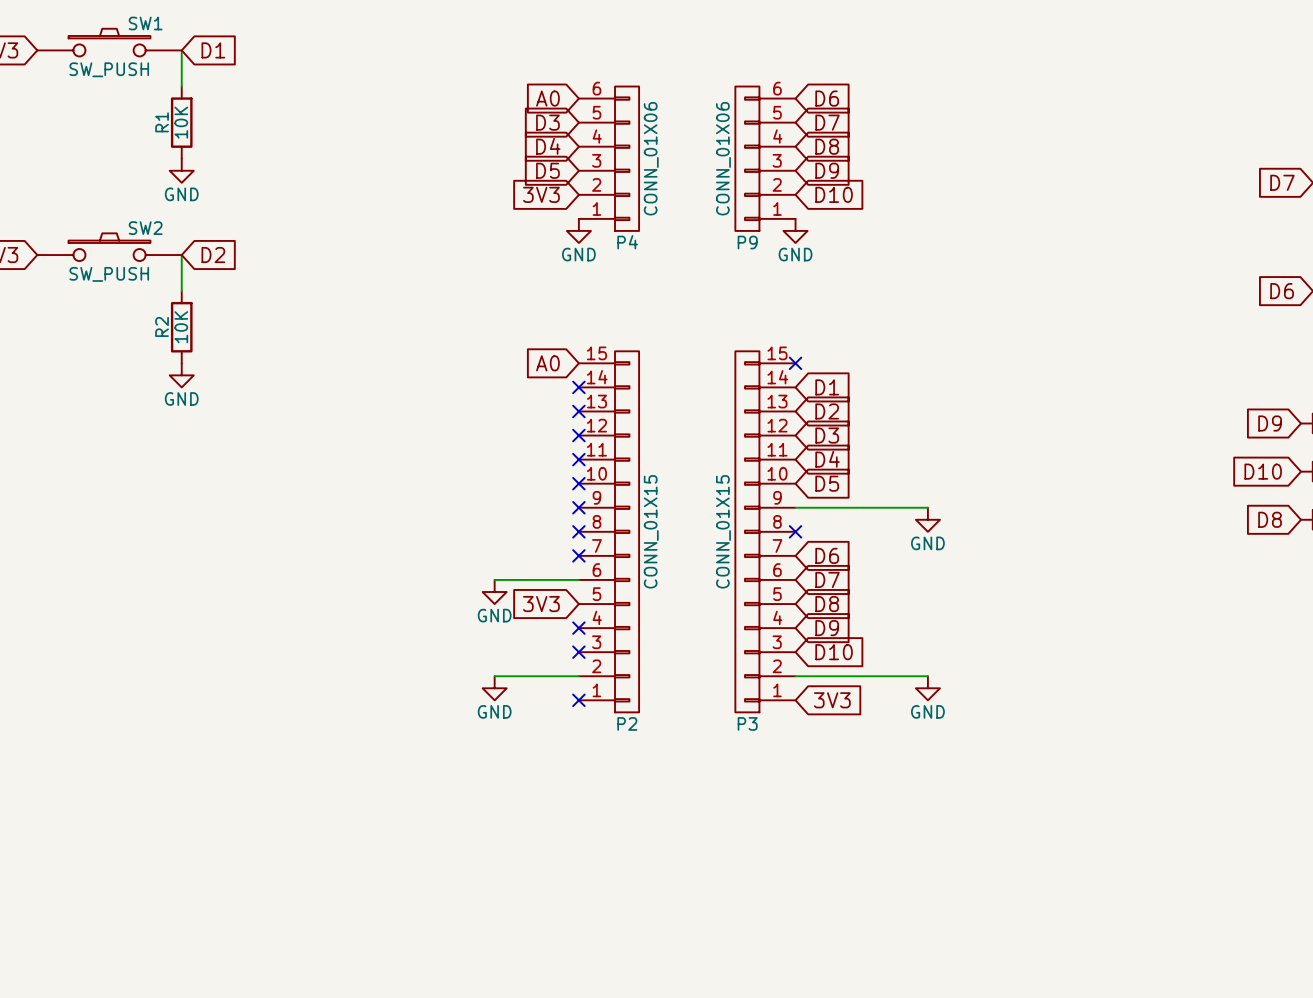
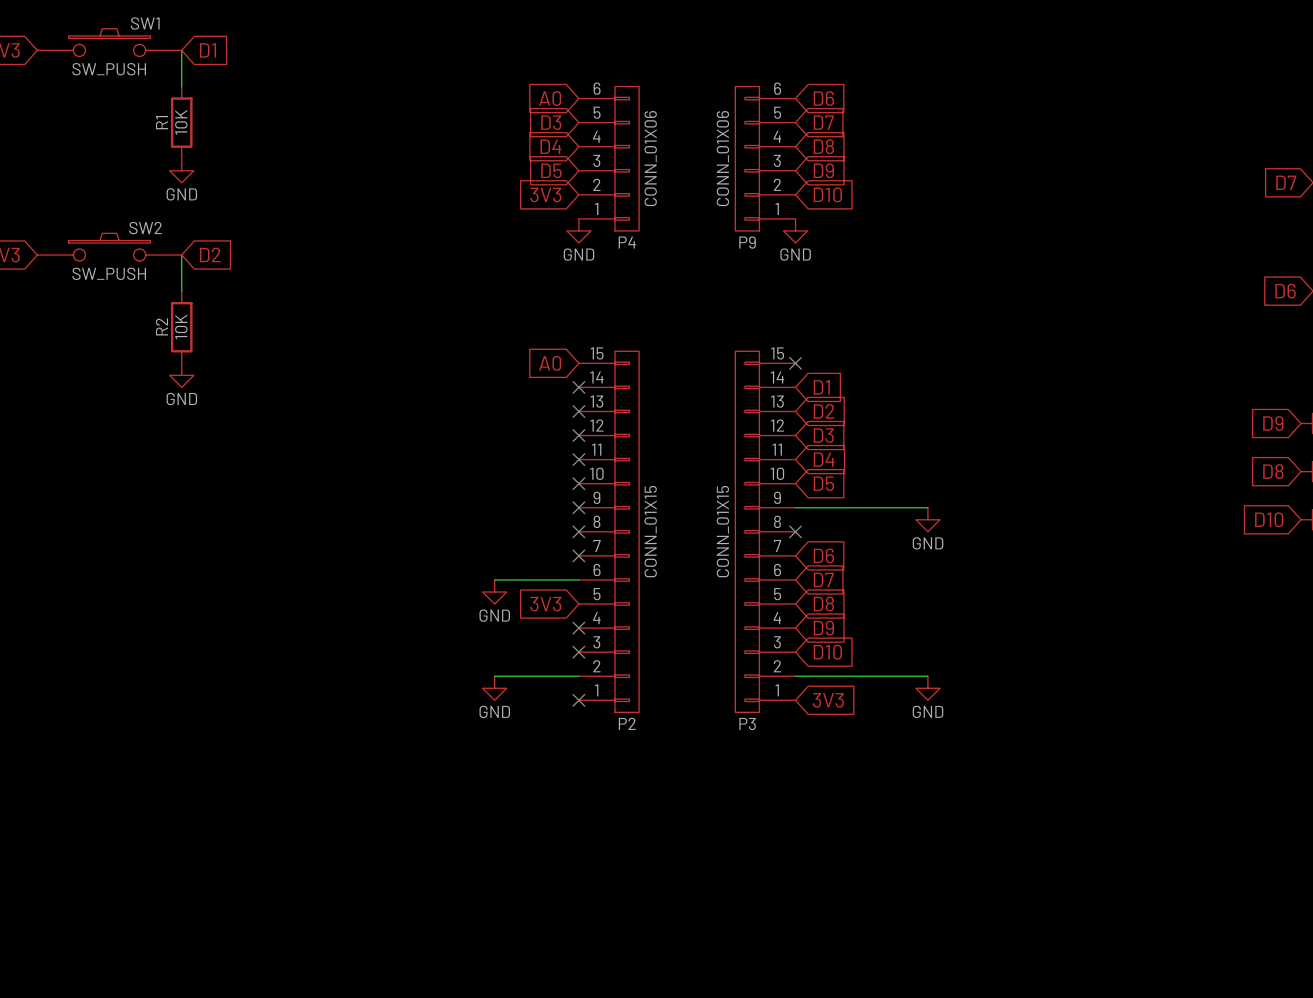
global label: D10 (1263, 471) -> D8 (1273, 471)
global label: D8 (1270, 519) -> D10 (1269, 519)

